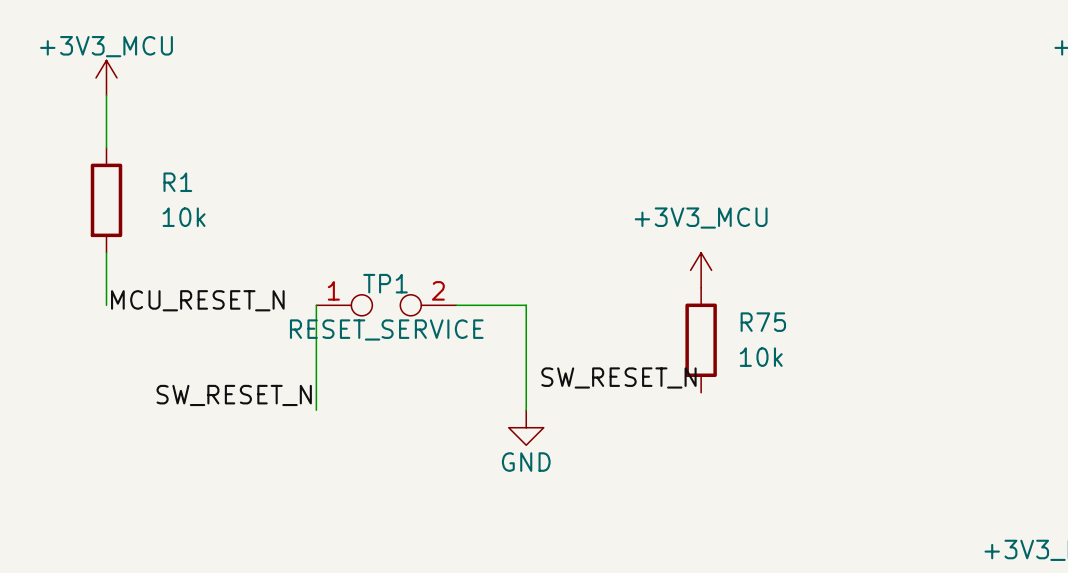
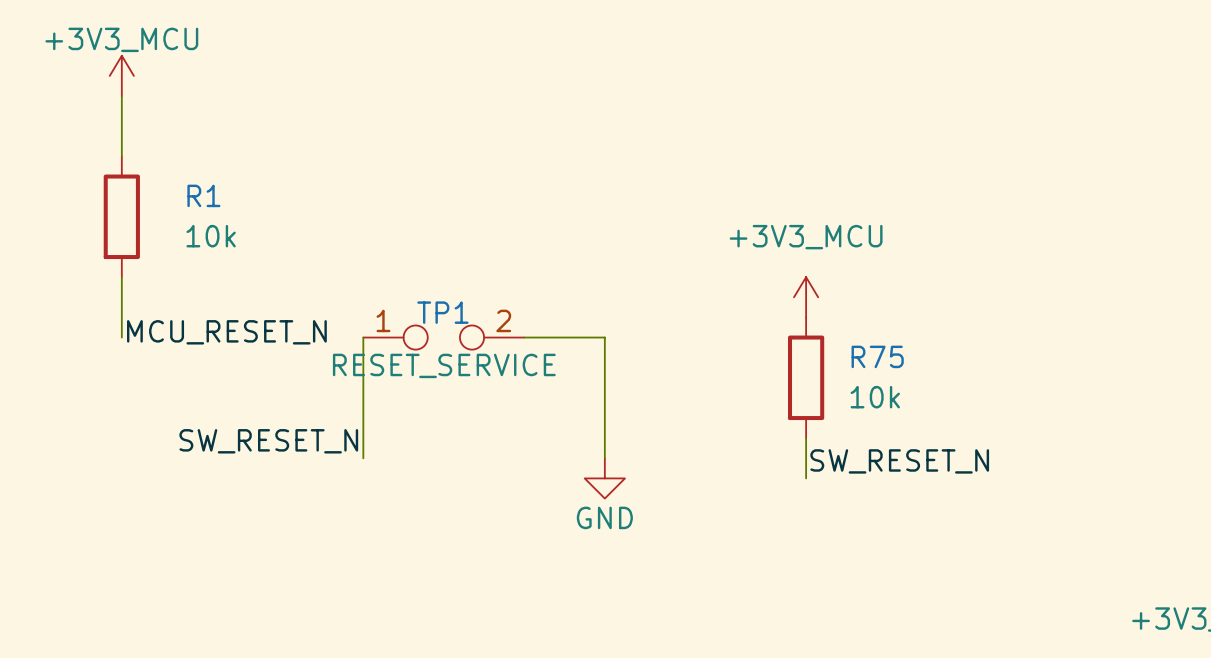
label position: SW_RESET_N (618, 377) -> SW_RESET_N (899, 461)
wire: none -> (806, 438) (806, 478)

